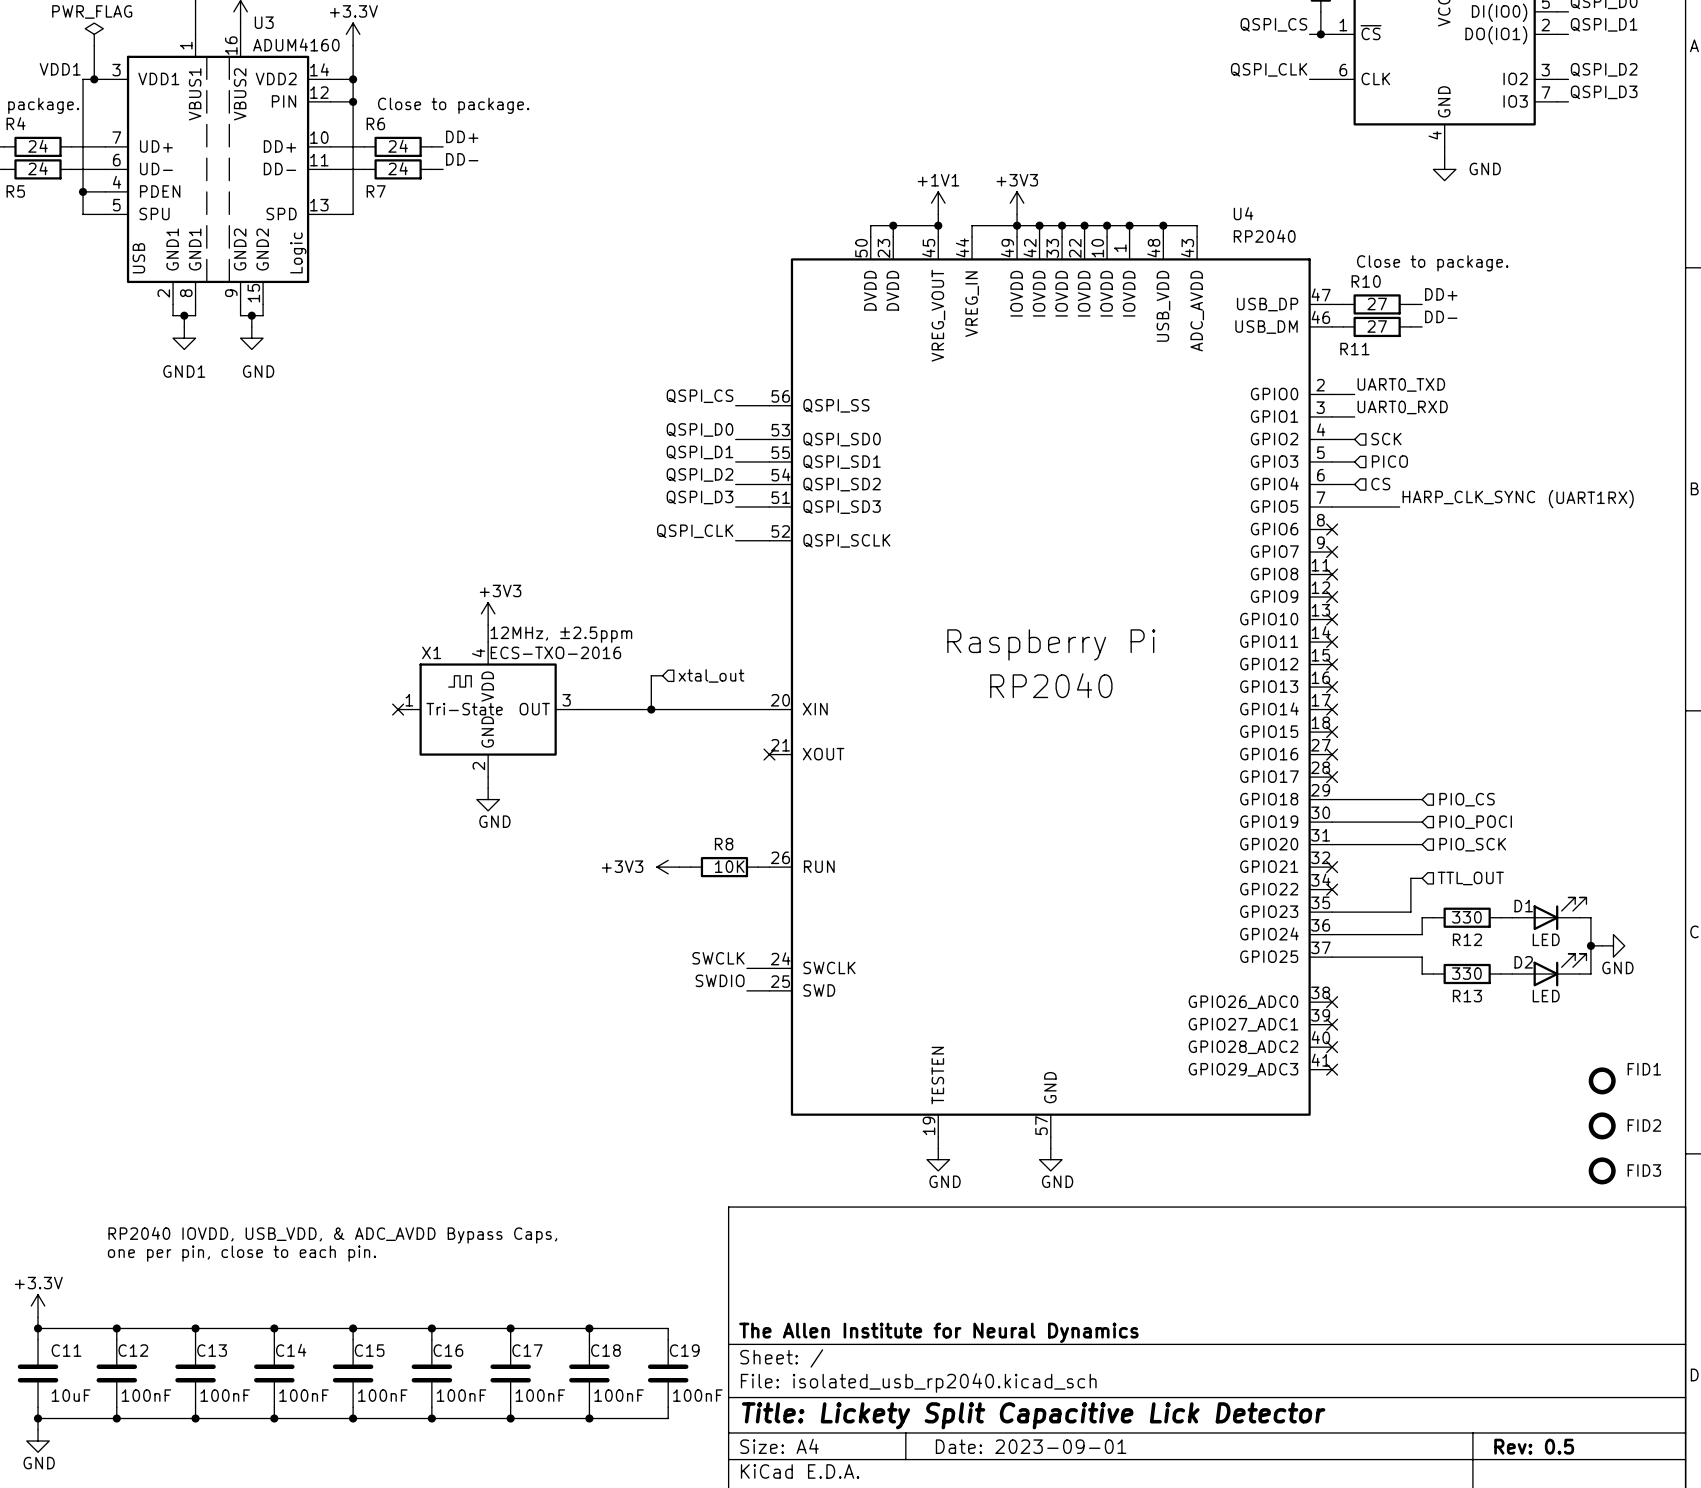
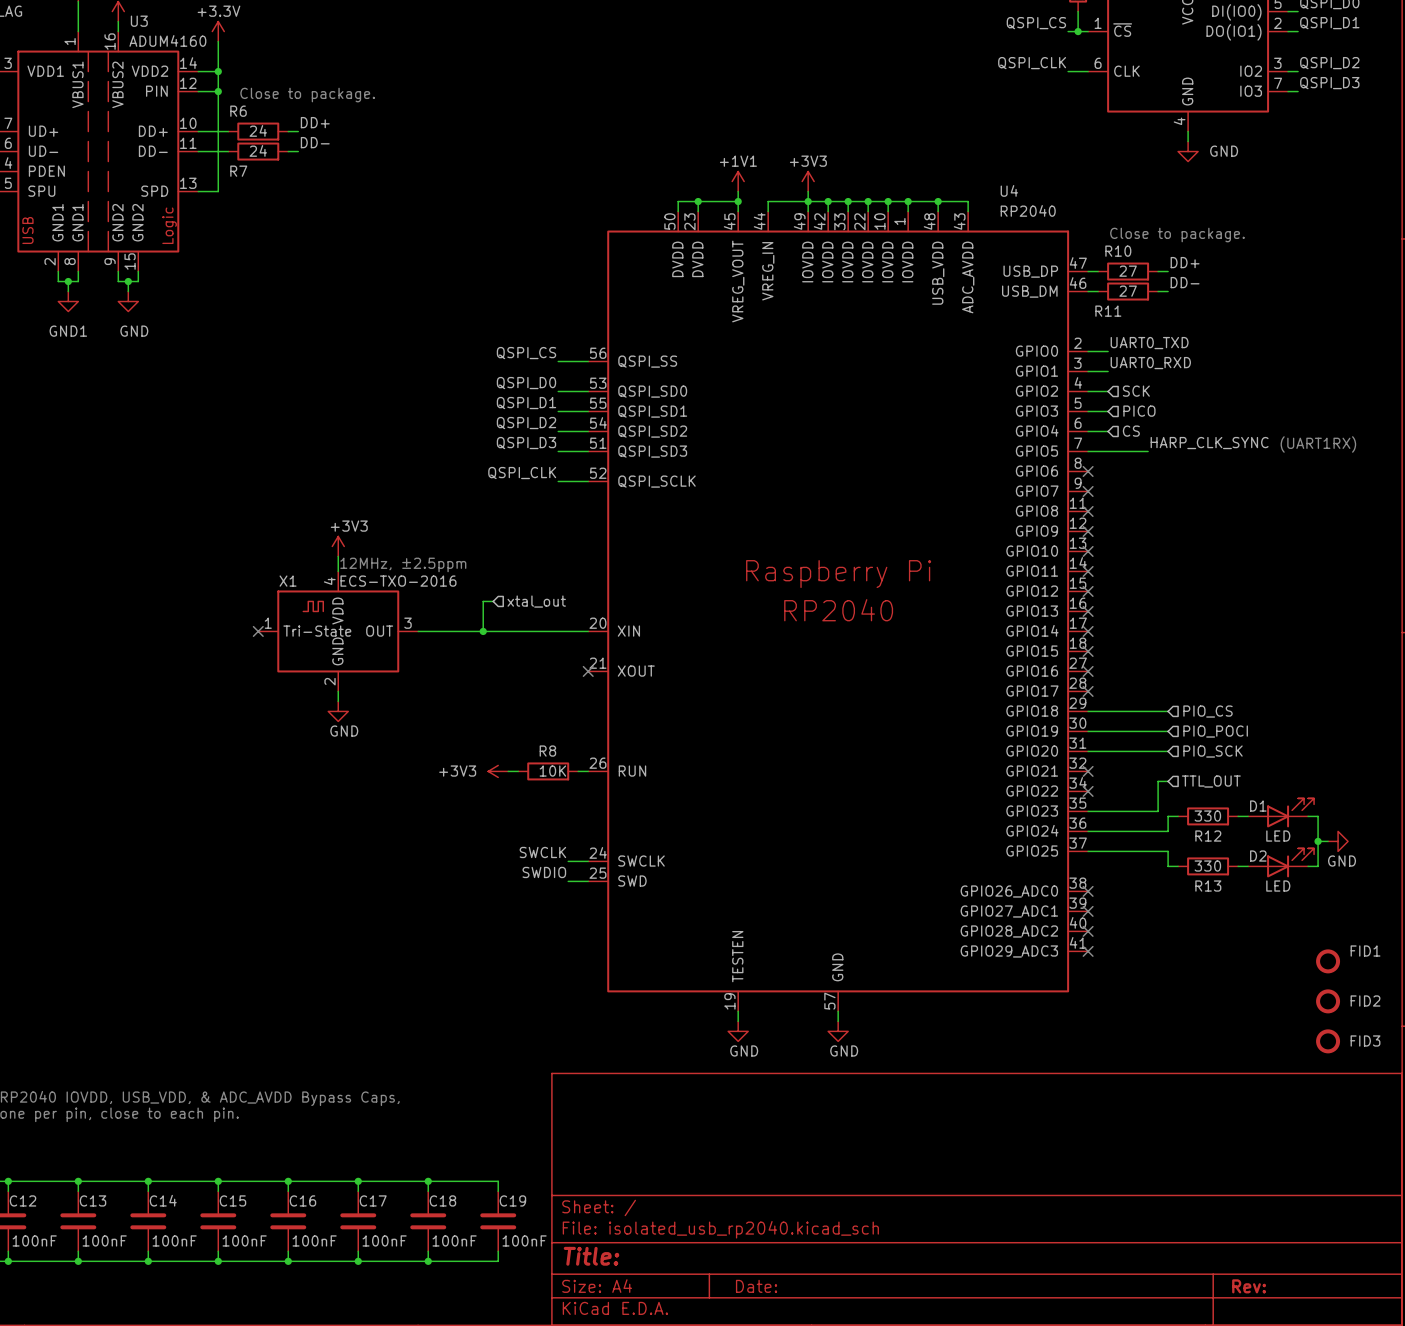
title block: The Allen Institute for Neural Dynamics (938, 1332) -> none
title block: Title: Lickety Split Capacitive Lick Detector (1033, 1415) -> Title: (591, 1256)
title block: Date: 2023-09-01 (1031, 1446) -> Date: (756, 1286)
title block: Rev: 0.5 (1534, 1446) -> Rev: (1249, 1286)

